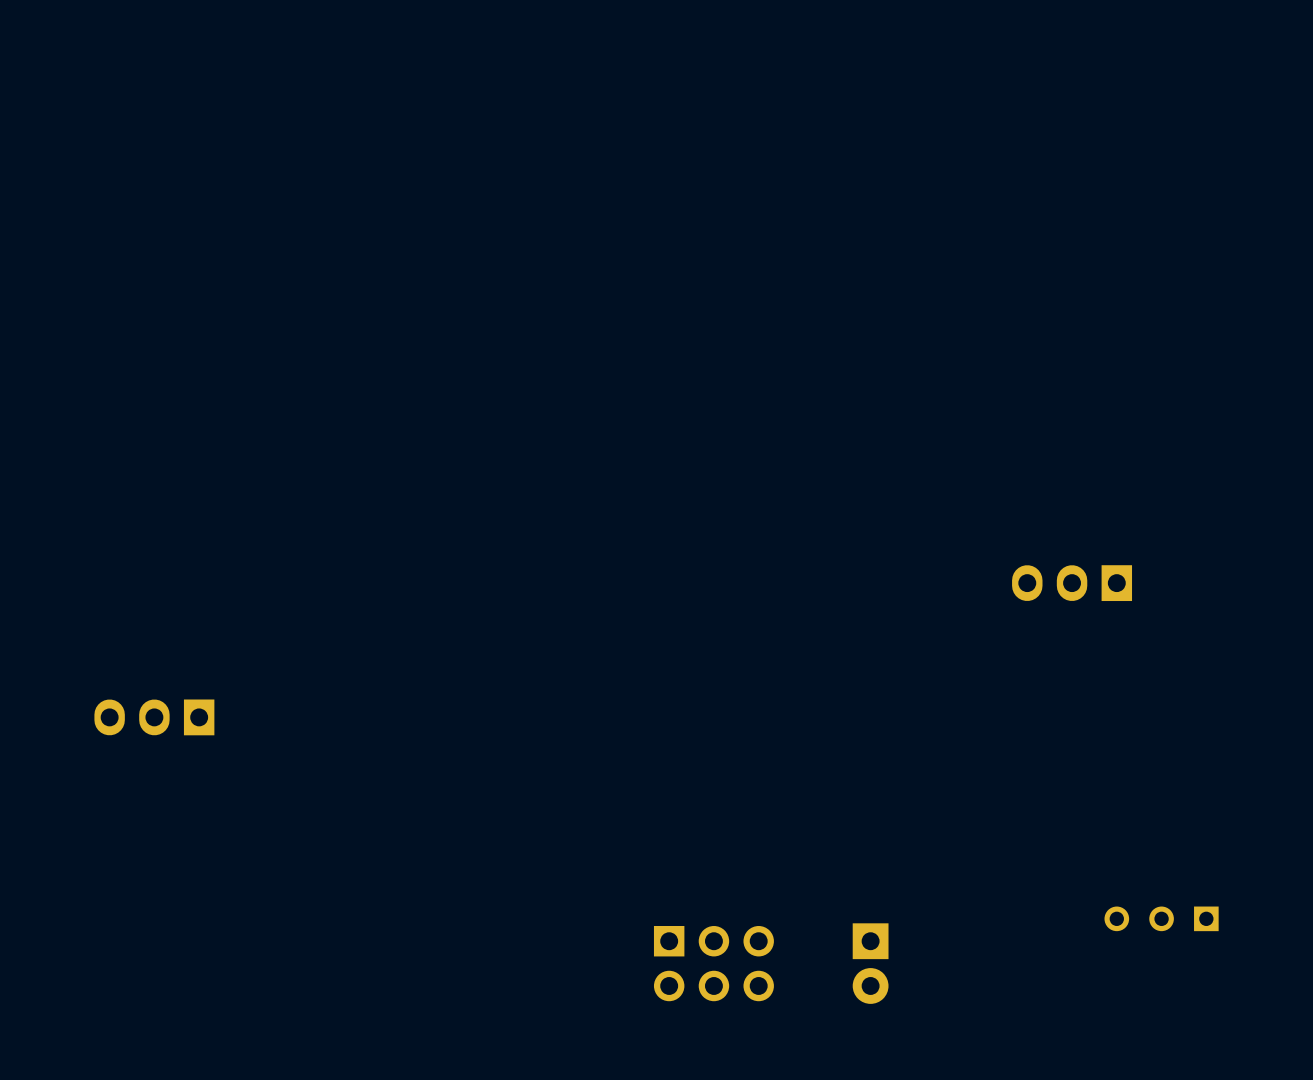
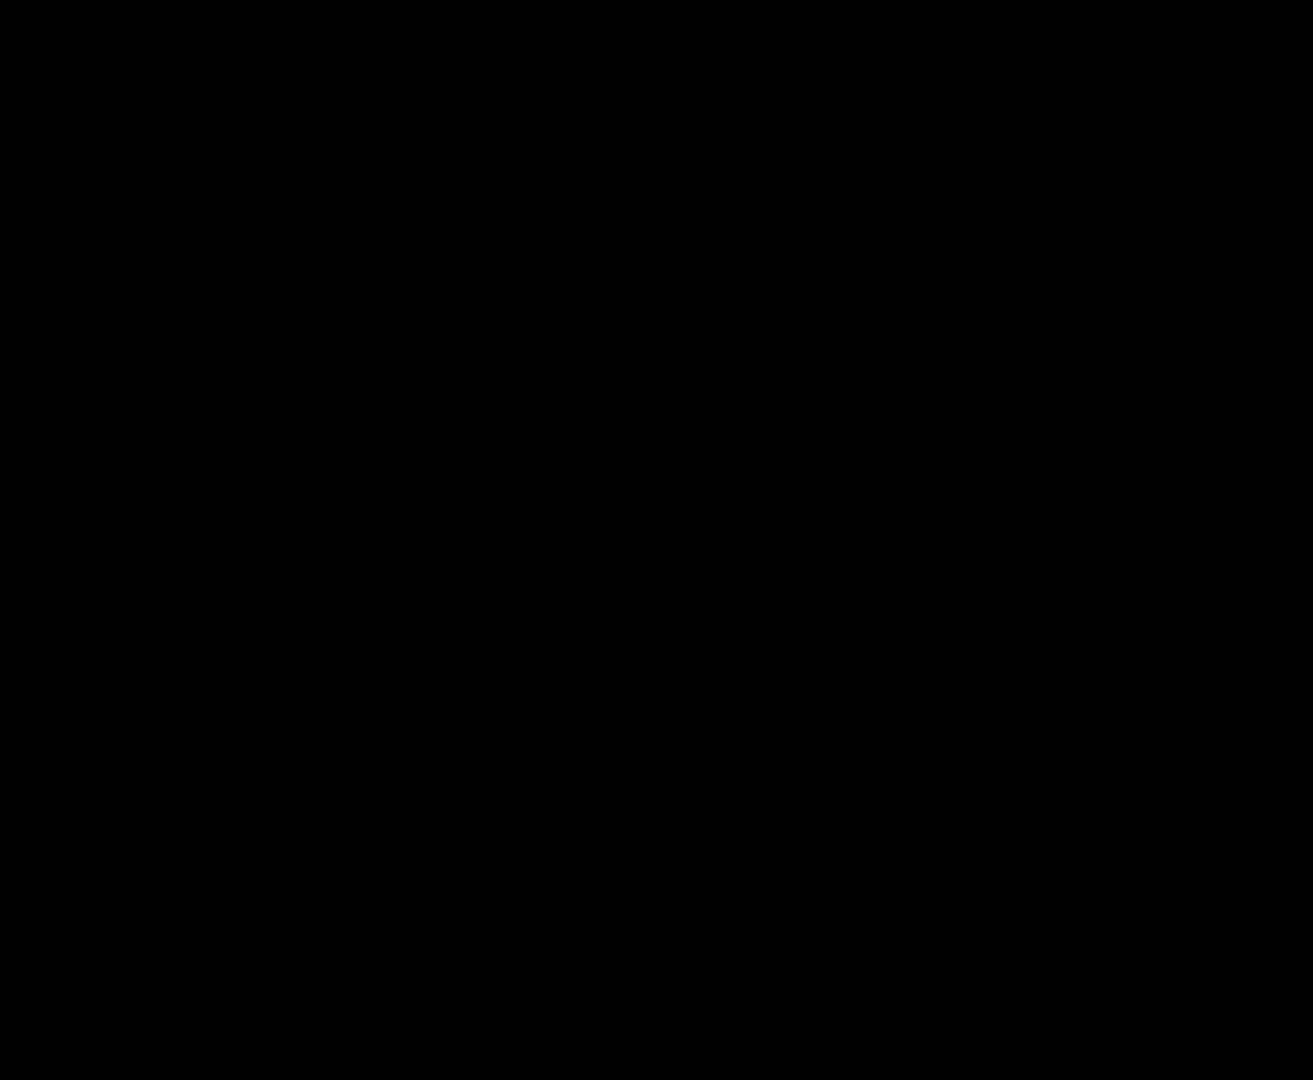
part: (1072, 583) -> none
part: (154, 717) -> none
part: (1161, 918) -> none
part: (713, 963) -> none
part: (870, 963) -> none

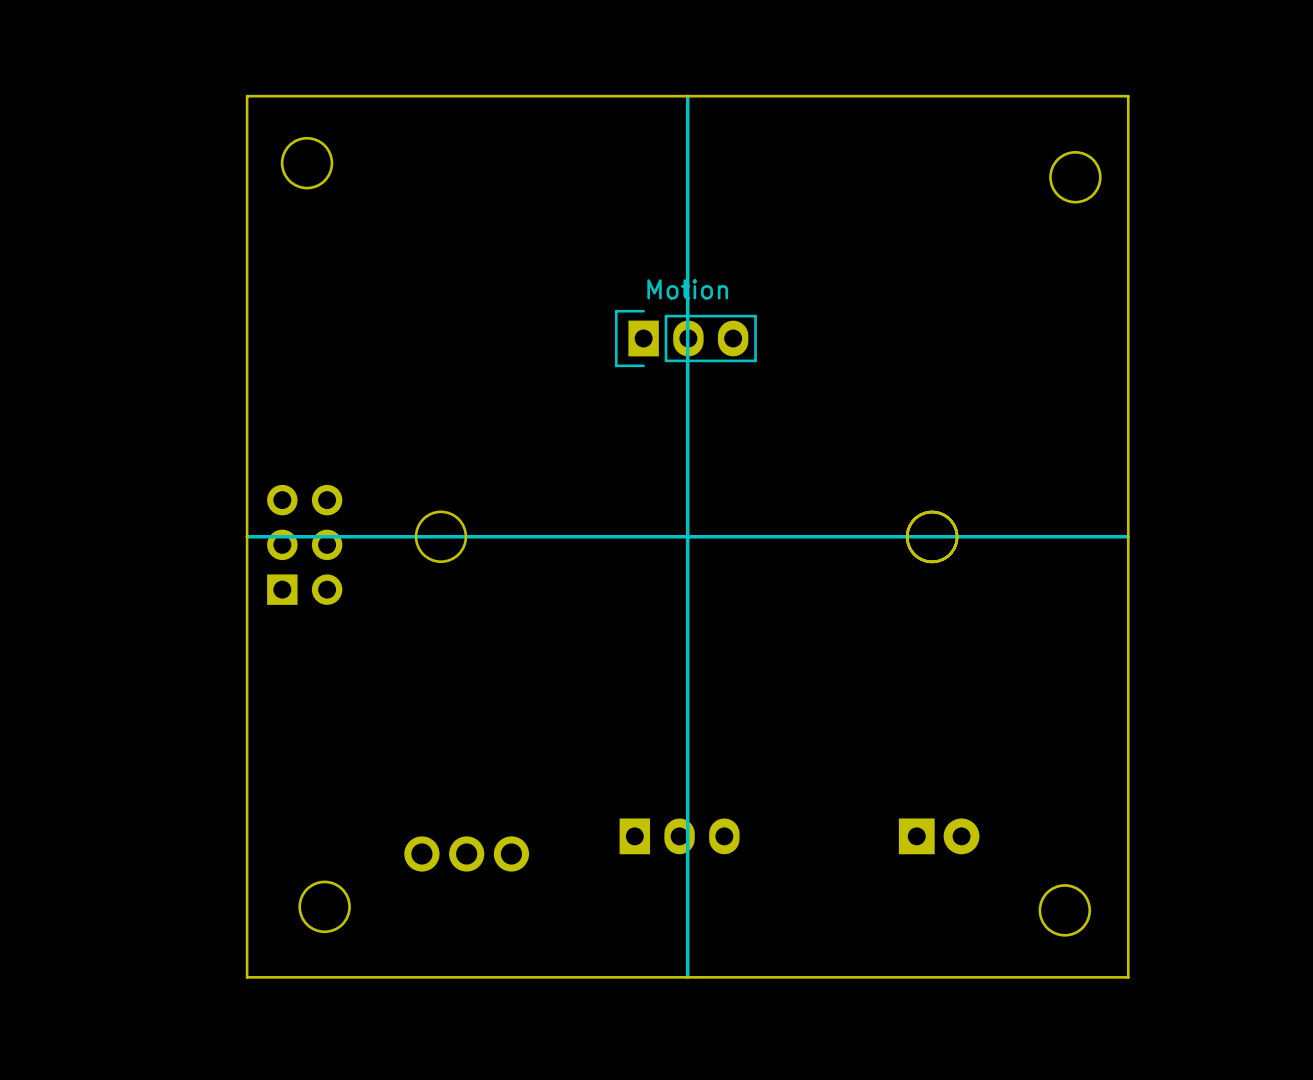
line: none -> (687, 96) (687, 977)
board edge: none -> (1128, 96) (1128, 977) (247, 977) (247, 96) (1128, 96)
round board edge: none -> [280, 136, 334, 190]
round board edge: none -> [1049, 151, 1102, 204]
part: none -> Motion (685, 338)
round board edge: none -> [414, 510, 468, 564]
round board edge: none -> [905, 510, 959, 564]
line: none -> (1128, 536) (247, 536)
part: none -> (304, 544)
part: none -> (679, 836)
part: none -> (939, 836)
part: none -> (466, 853)
round board edge: none -> [298, 880, 351, 934]
round board edge: none -> [1038, 884, 1092, 937]

